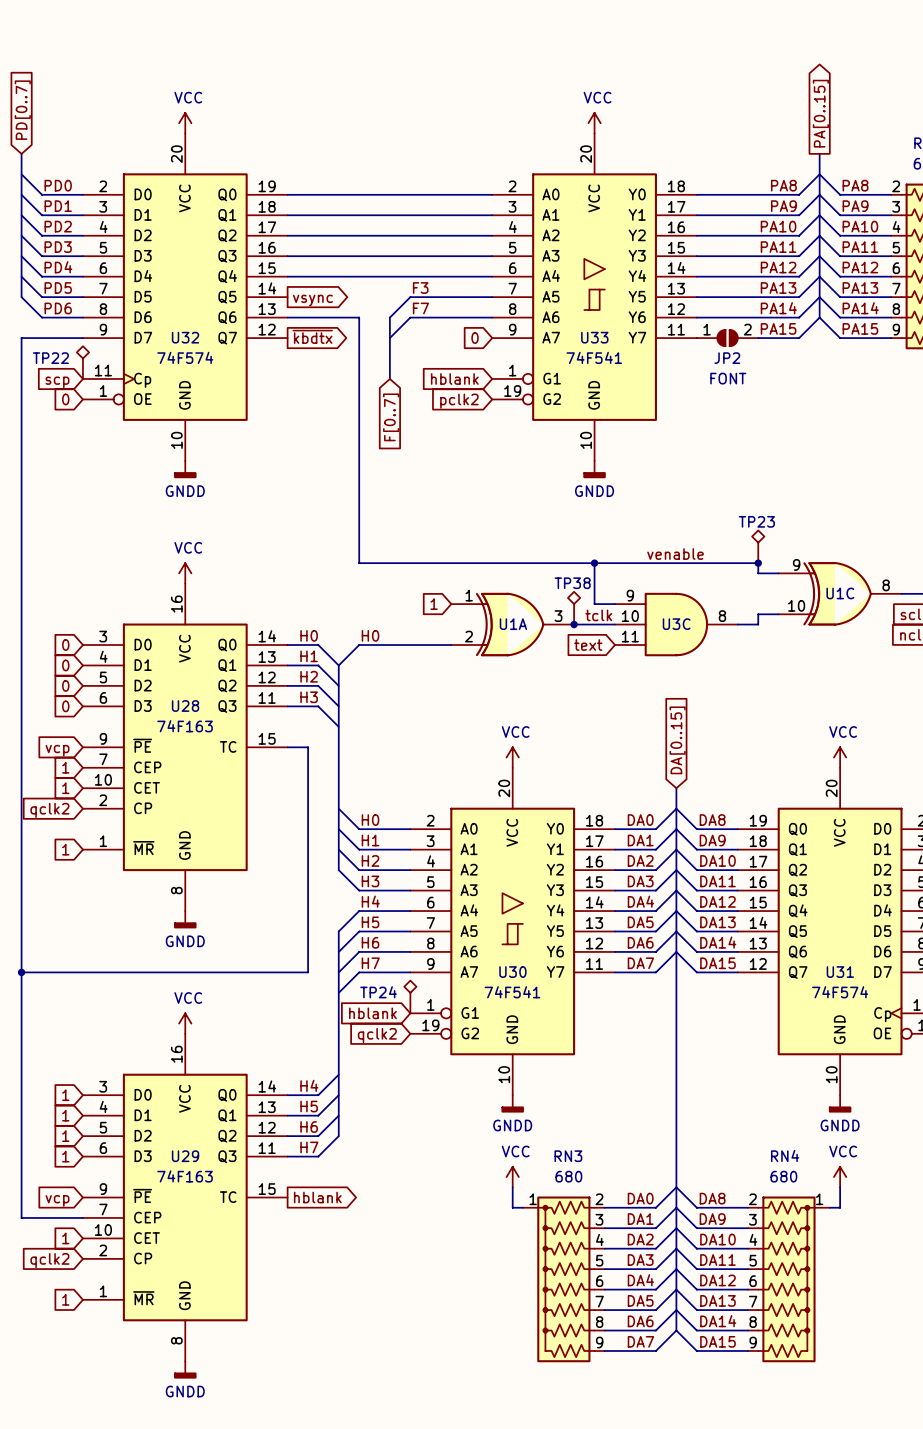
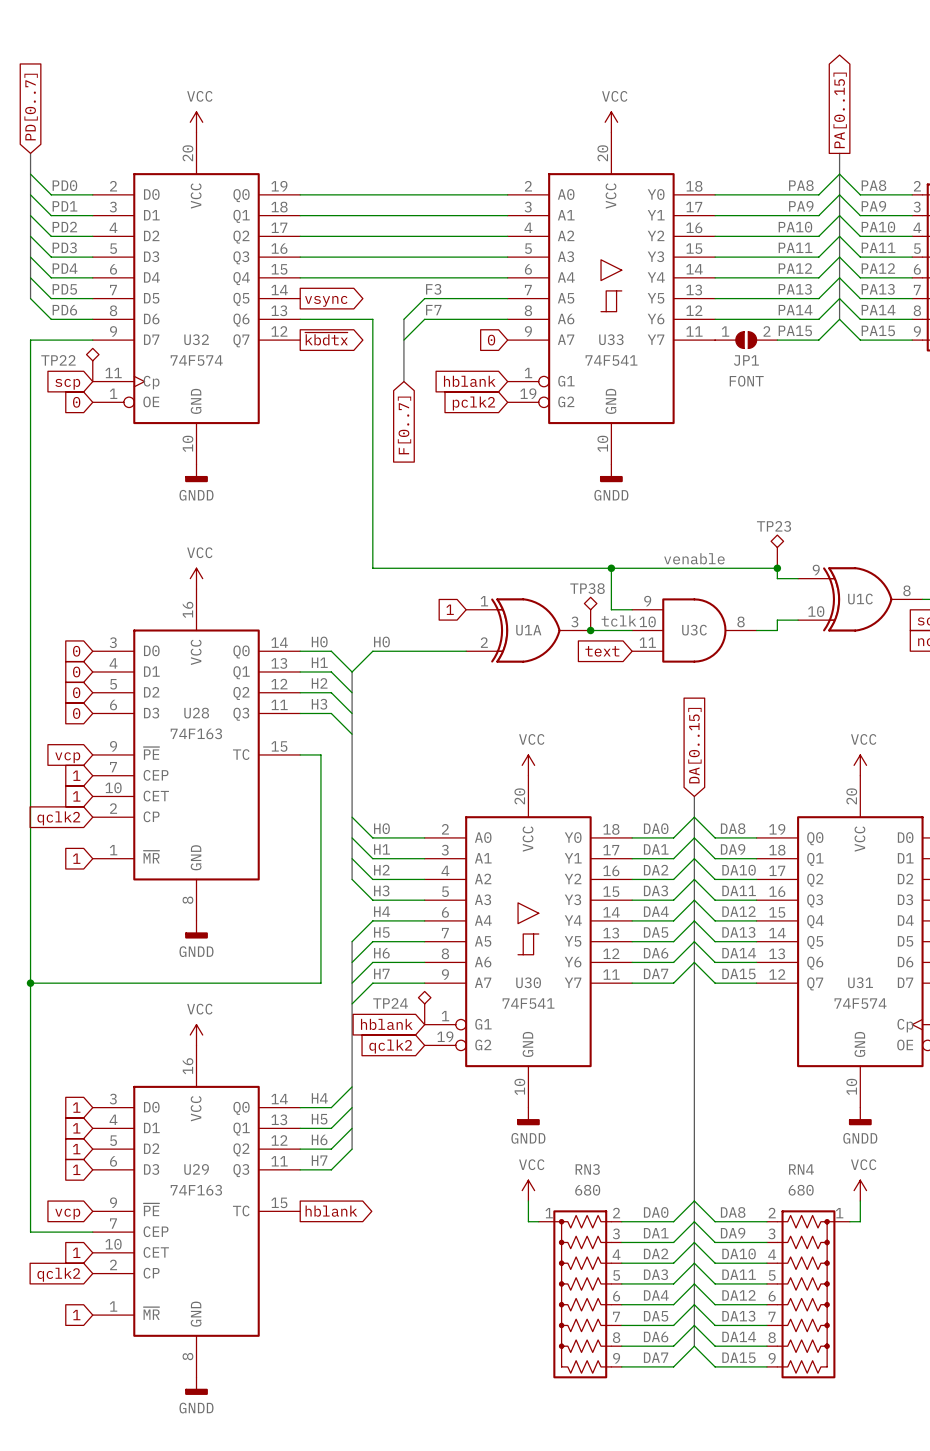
JP2 name: JP2 (727, 358) -> JP1 (746, 360)

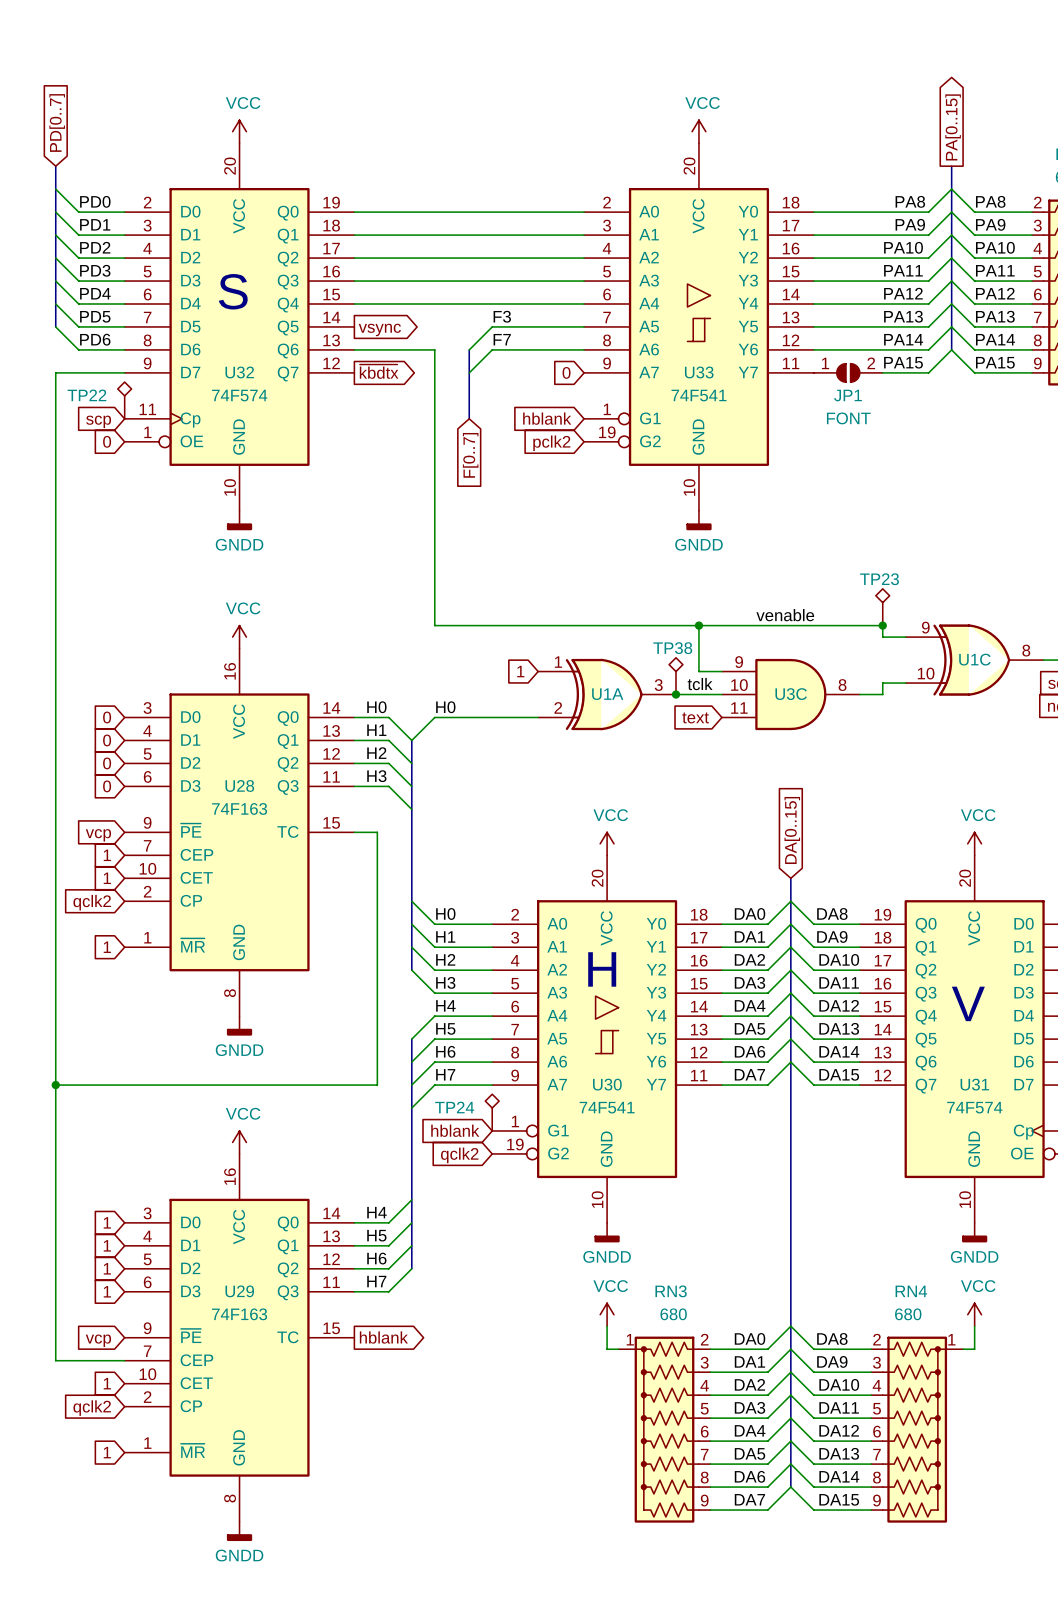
text: none -> S (233, 291)
text: none -> H (602, 969)
text: none -> V (968, 1003)

